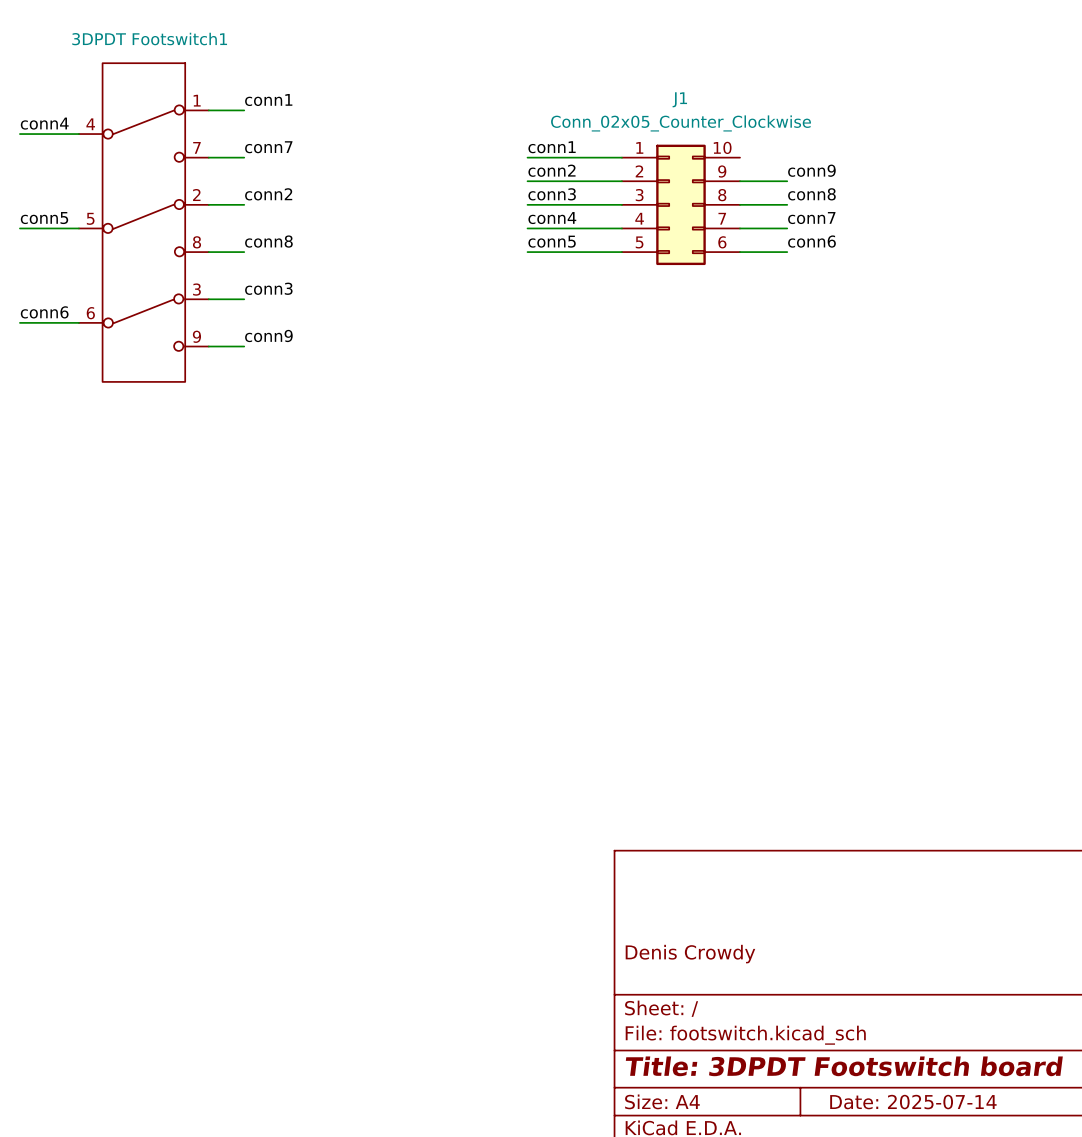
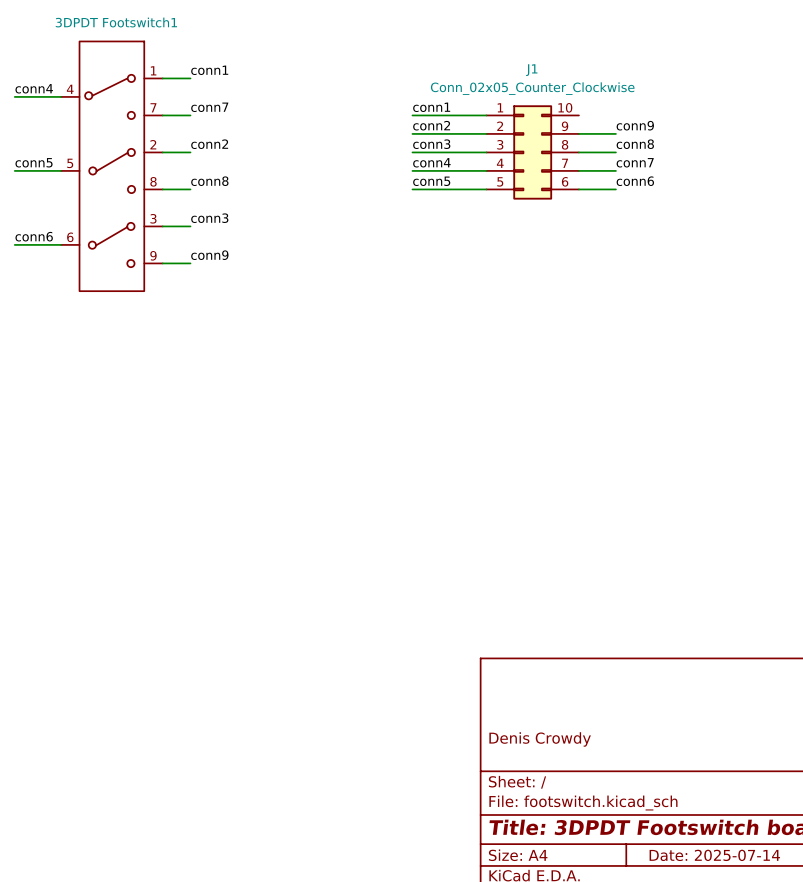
3DPDT Footswitch1 symbol: [78, 63, 209, 382] -> [61, 41, 163, 292]

